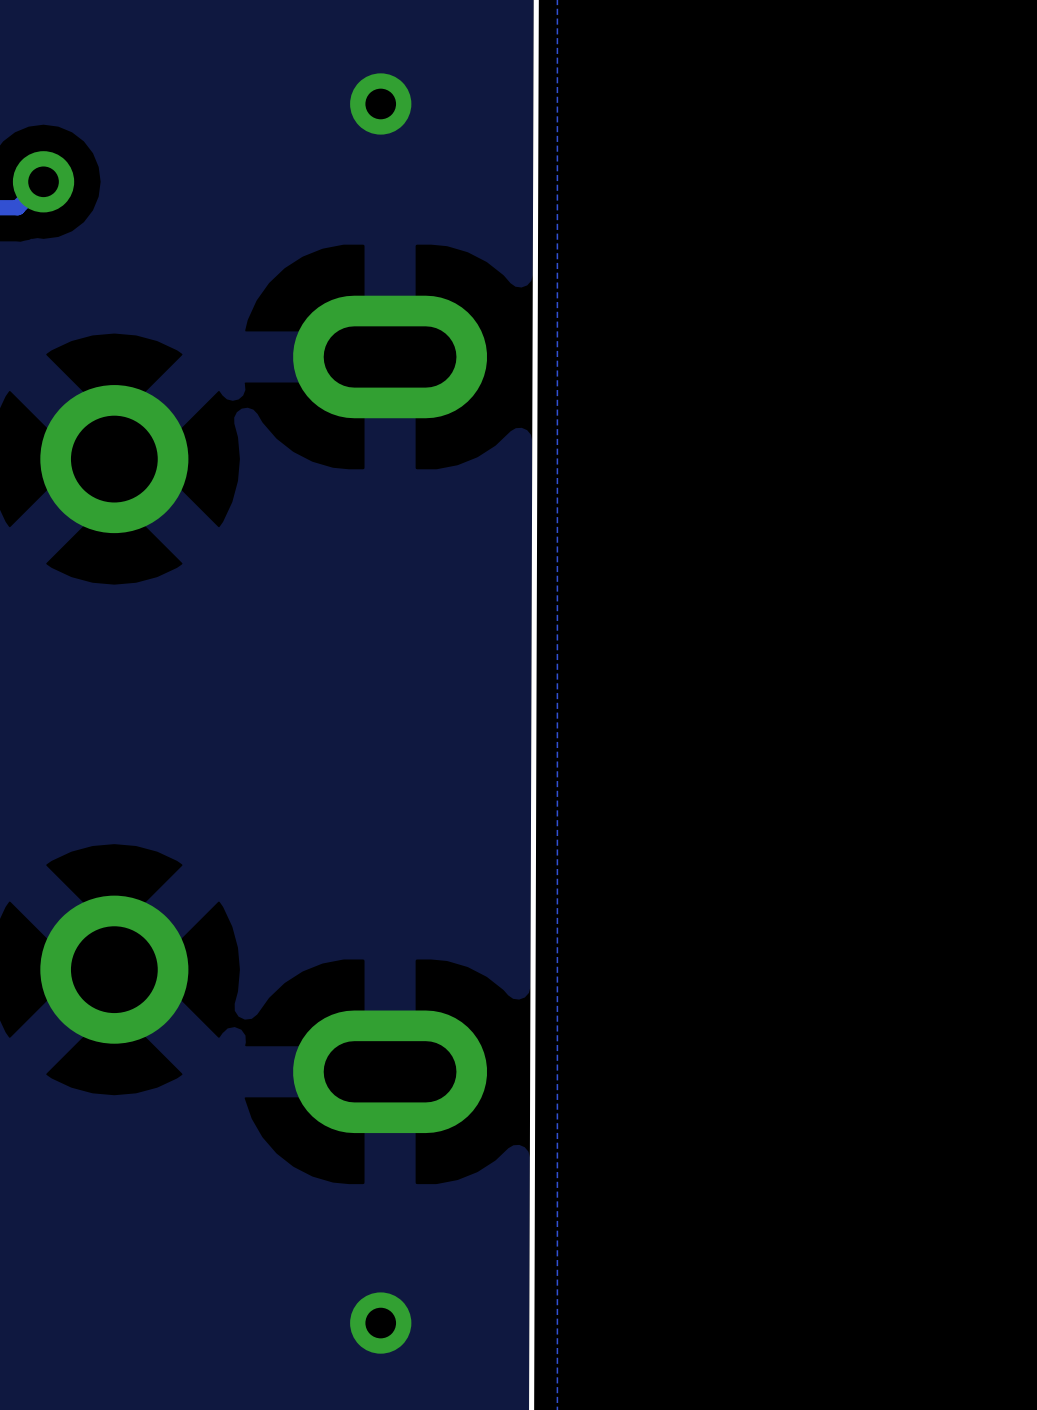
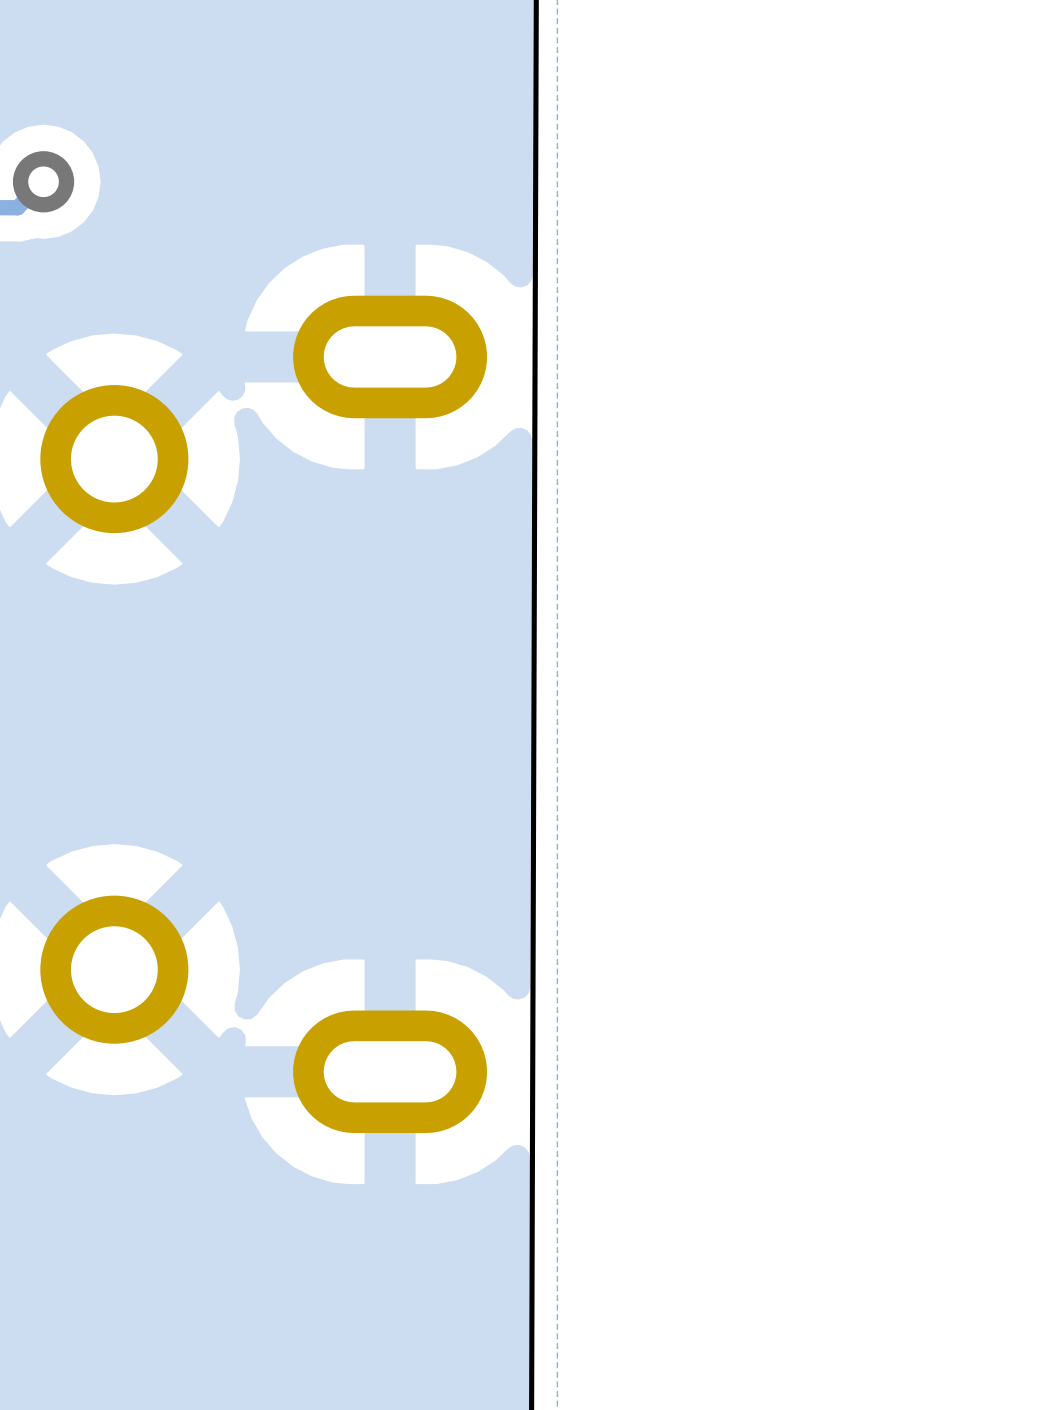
via: (380, 103) -> none
via: (380, 1323) -> none

